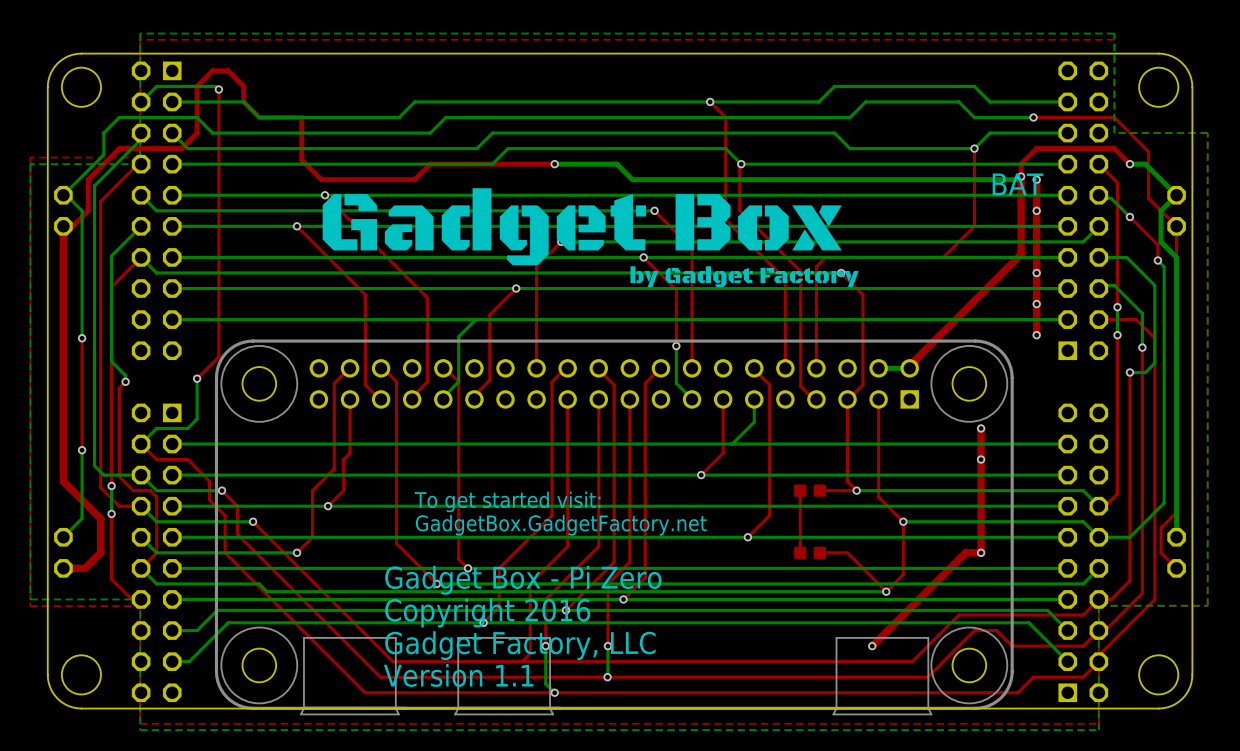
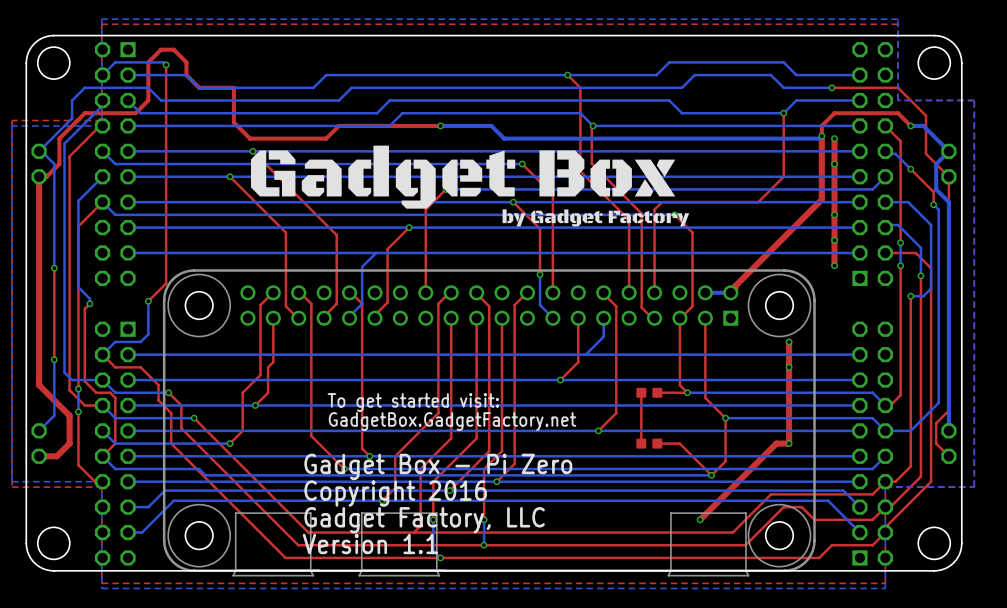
text: BAT (1017, 184) -> none

